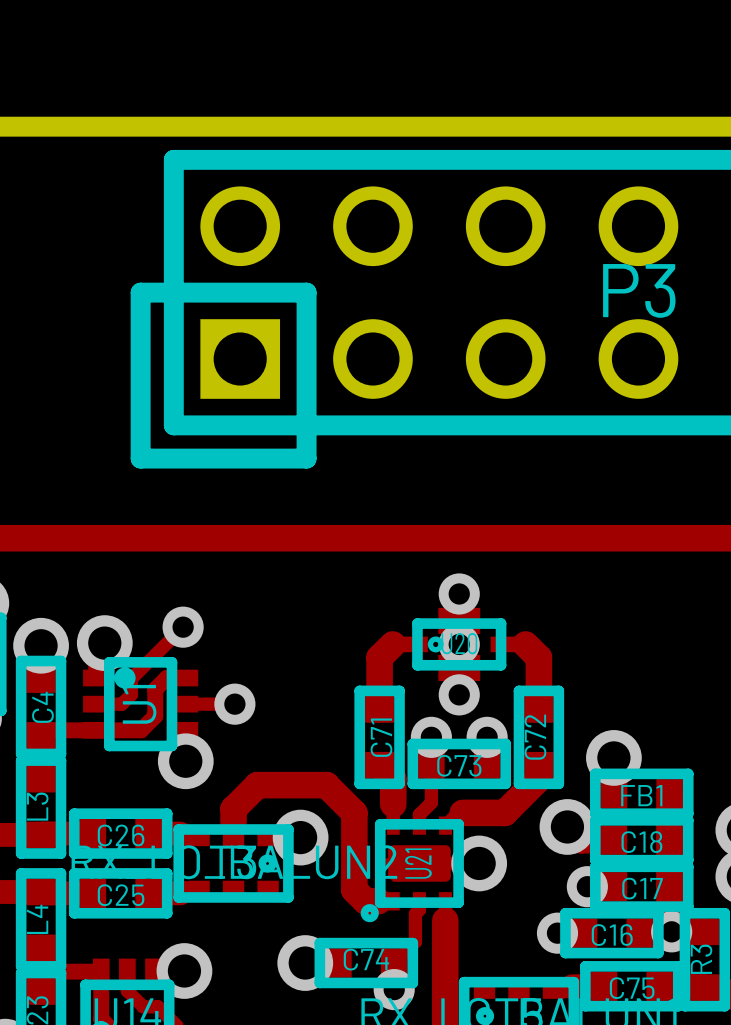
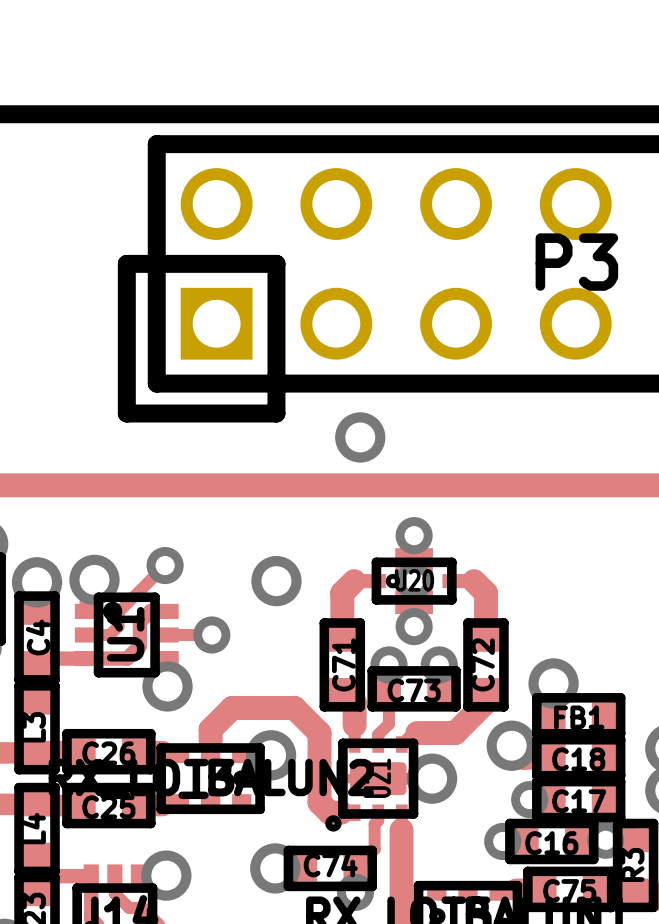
via: none -> (360, 437)
via: none -> (276, 581)

